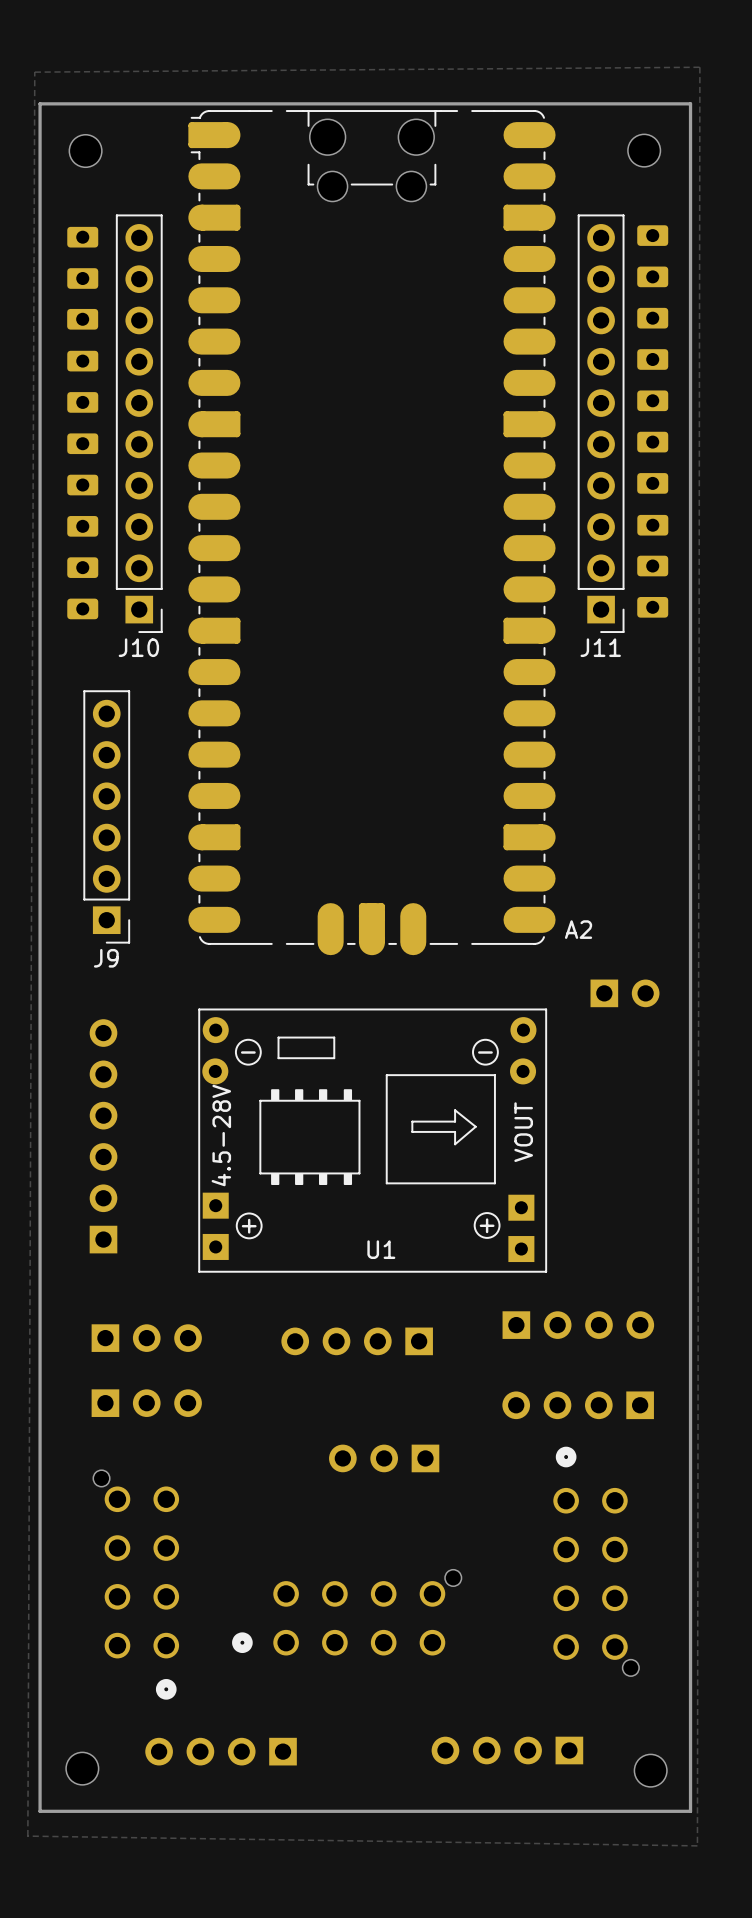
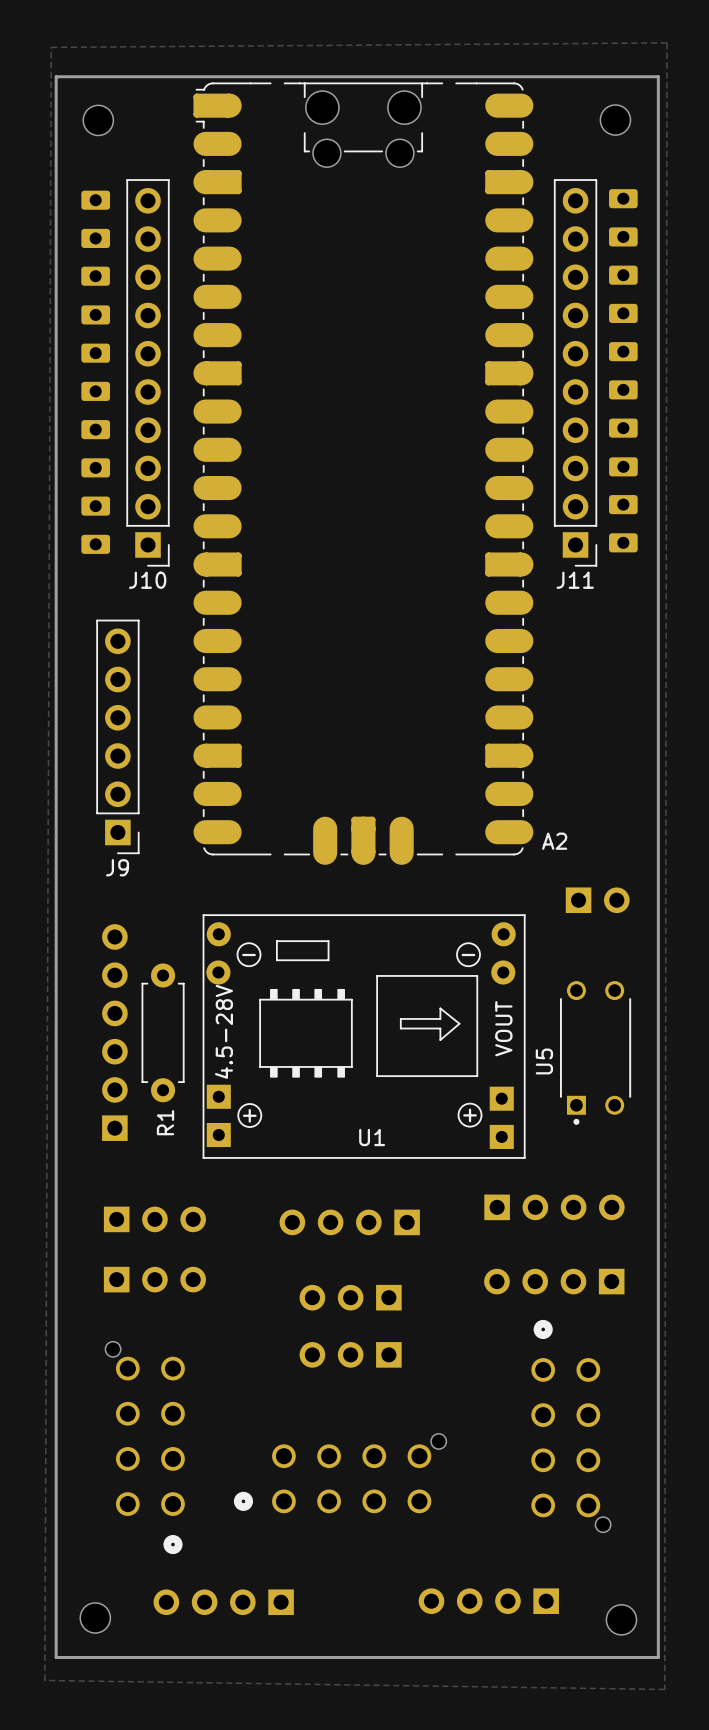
R1: none -> (163, 1032)
U5: none -> (595, 1052)
part: none -> (350, 1297)
part: (384, 1458) -> none
part: none -> (350, 1354)

